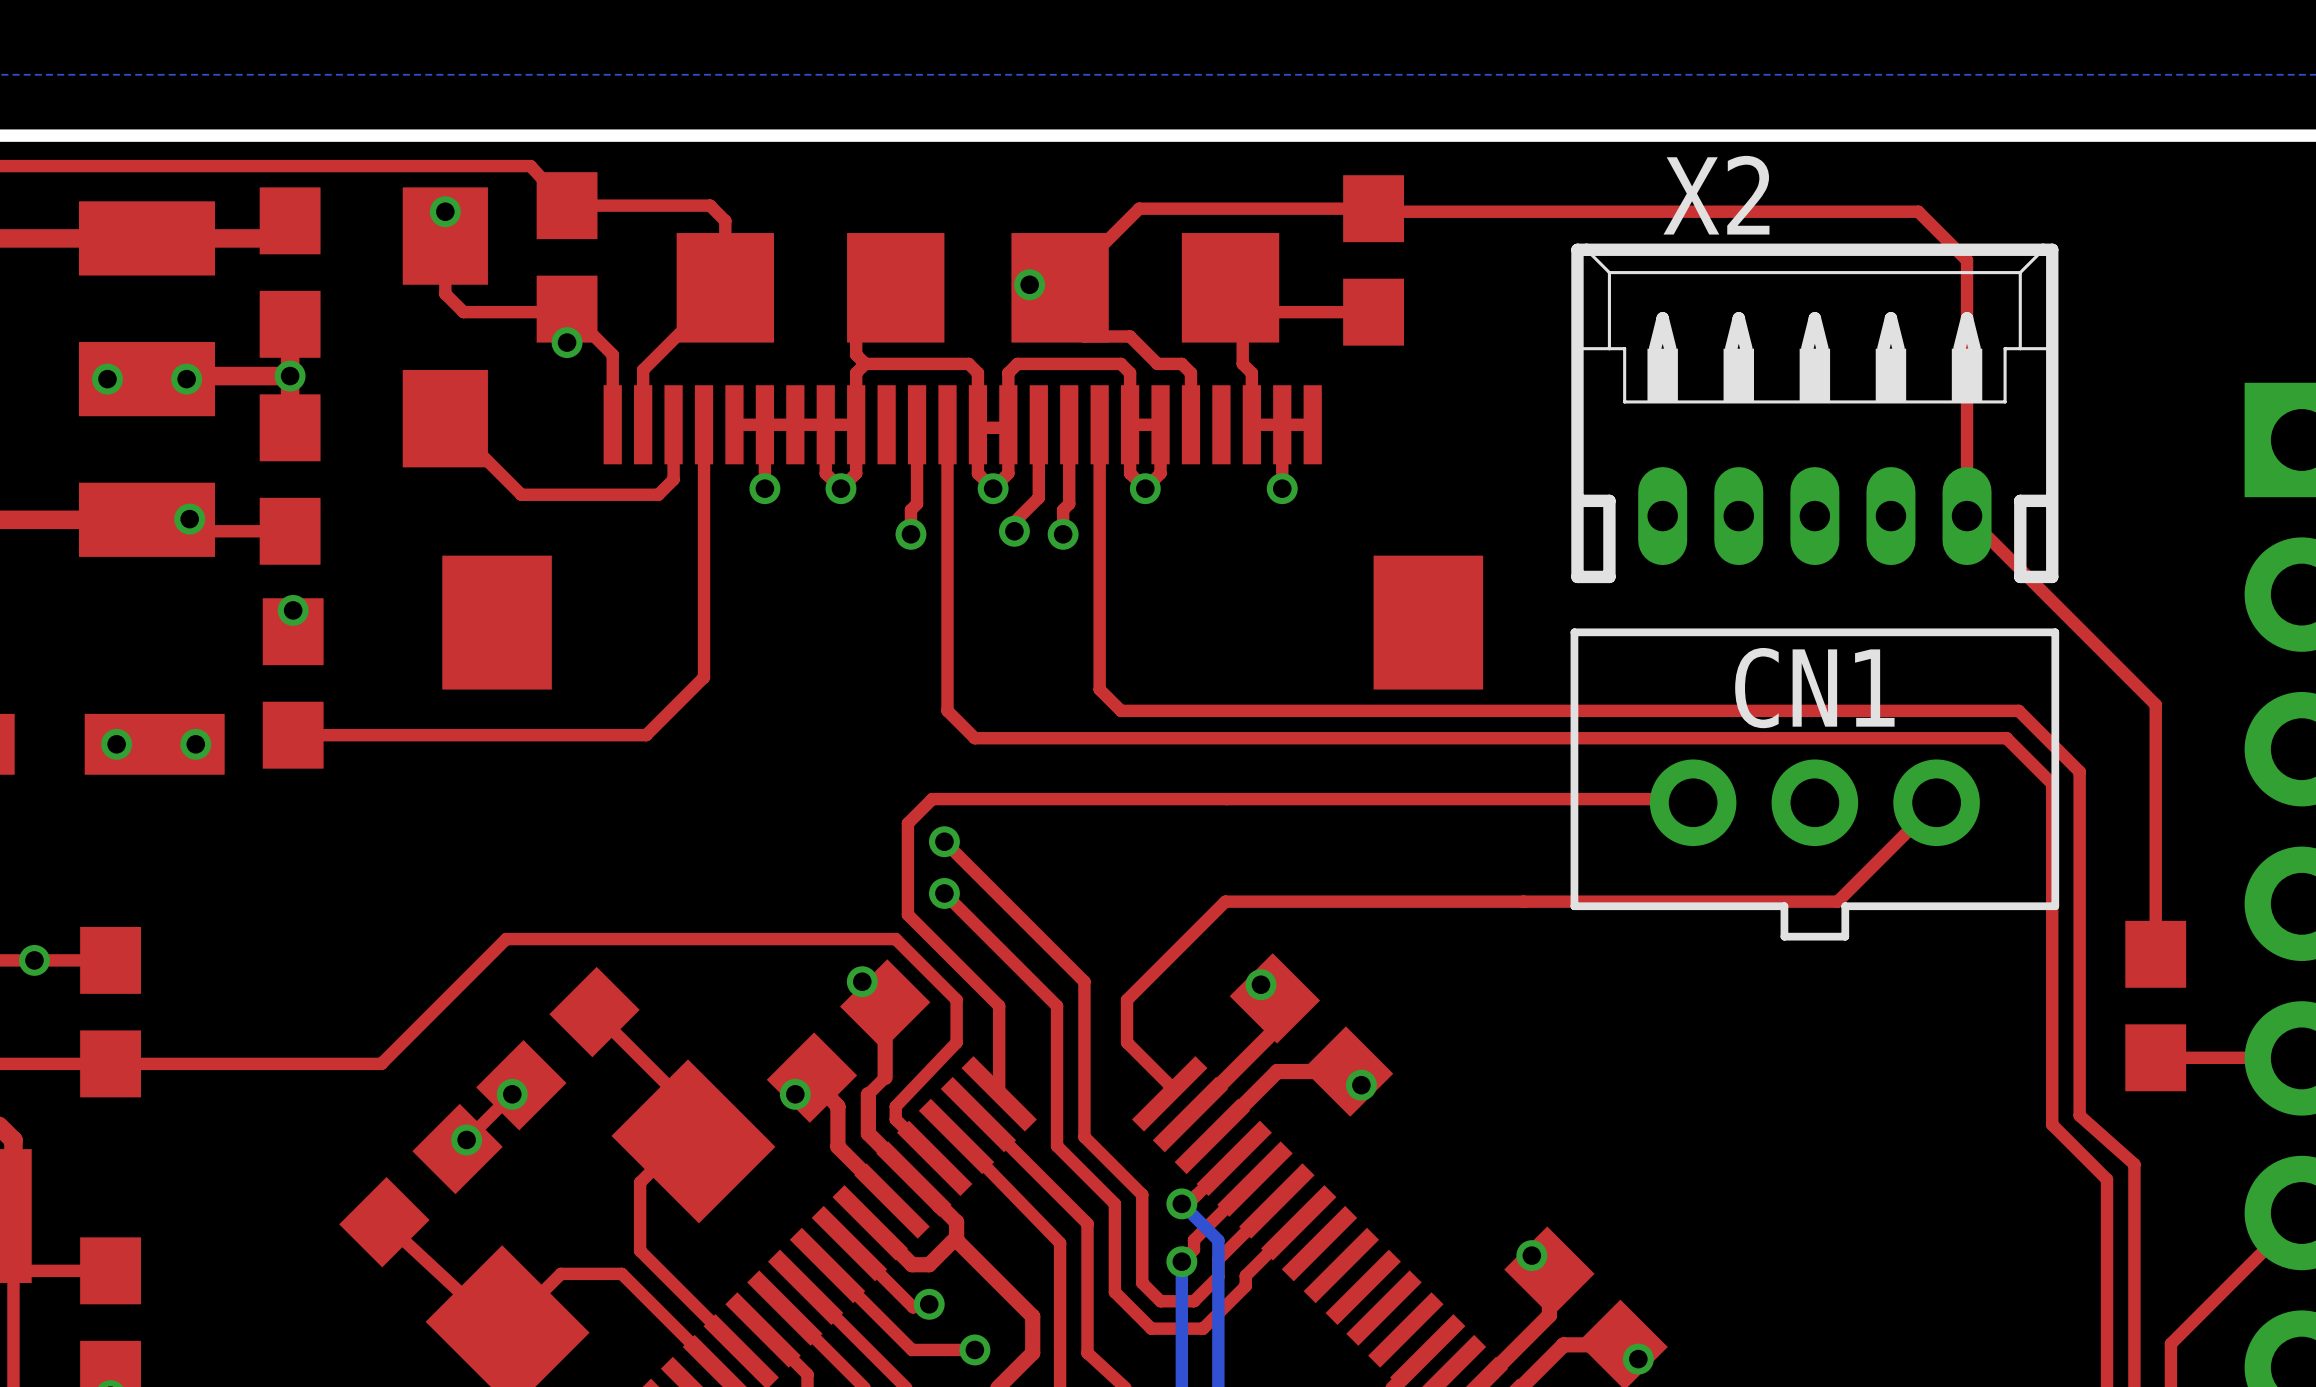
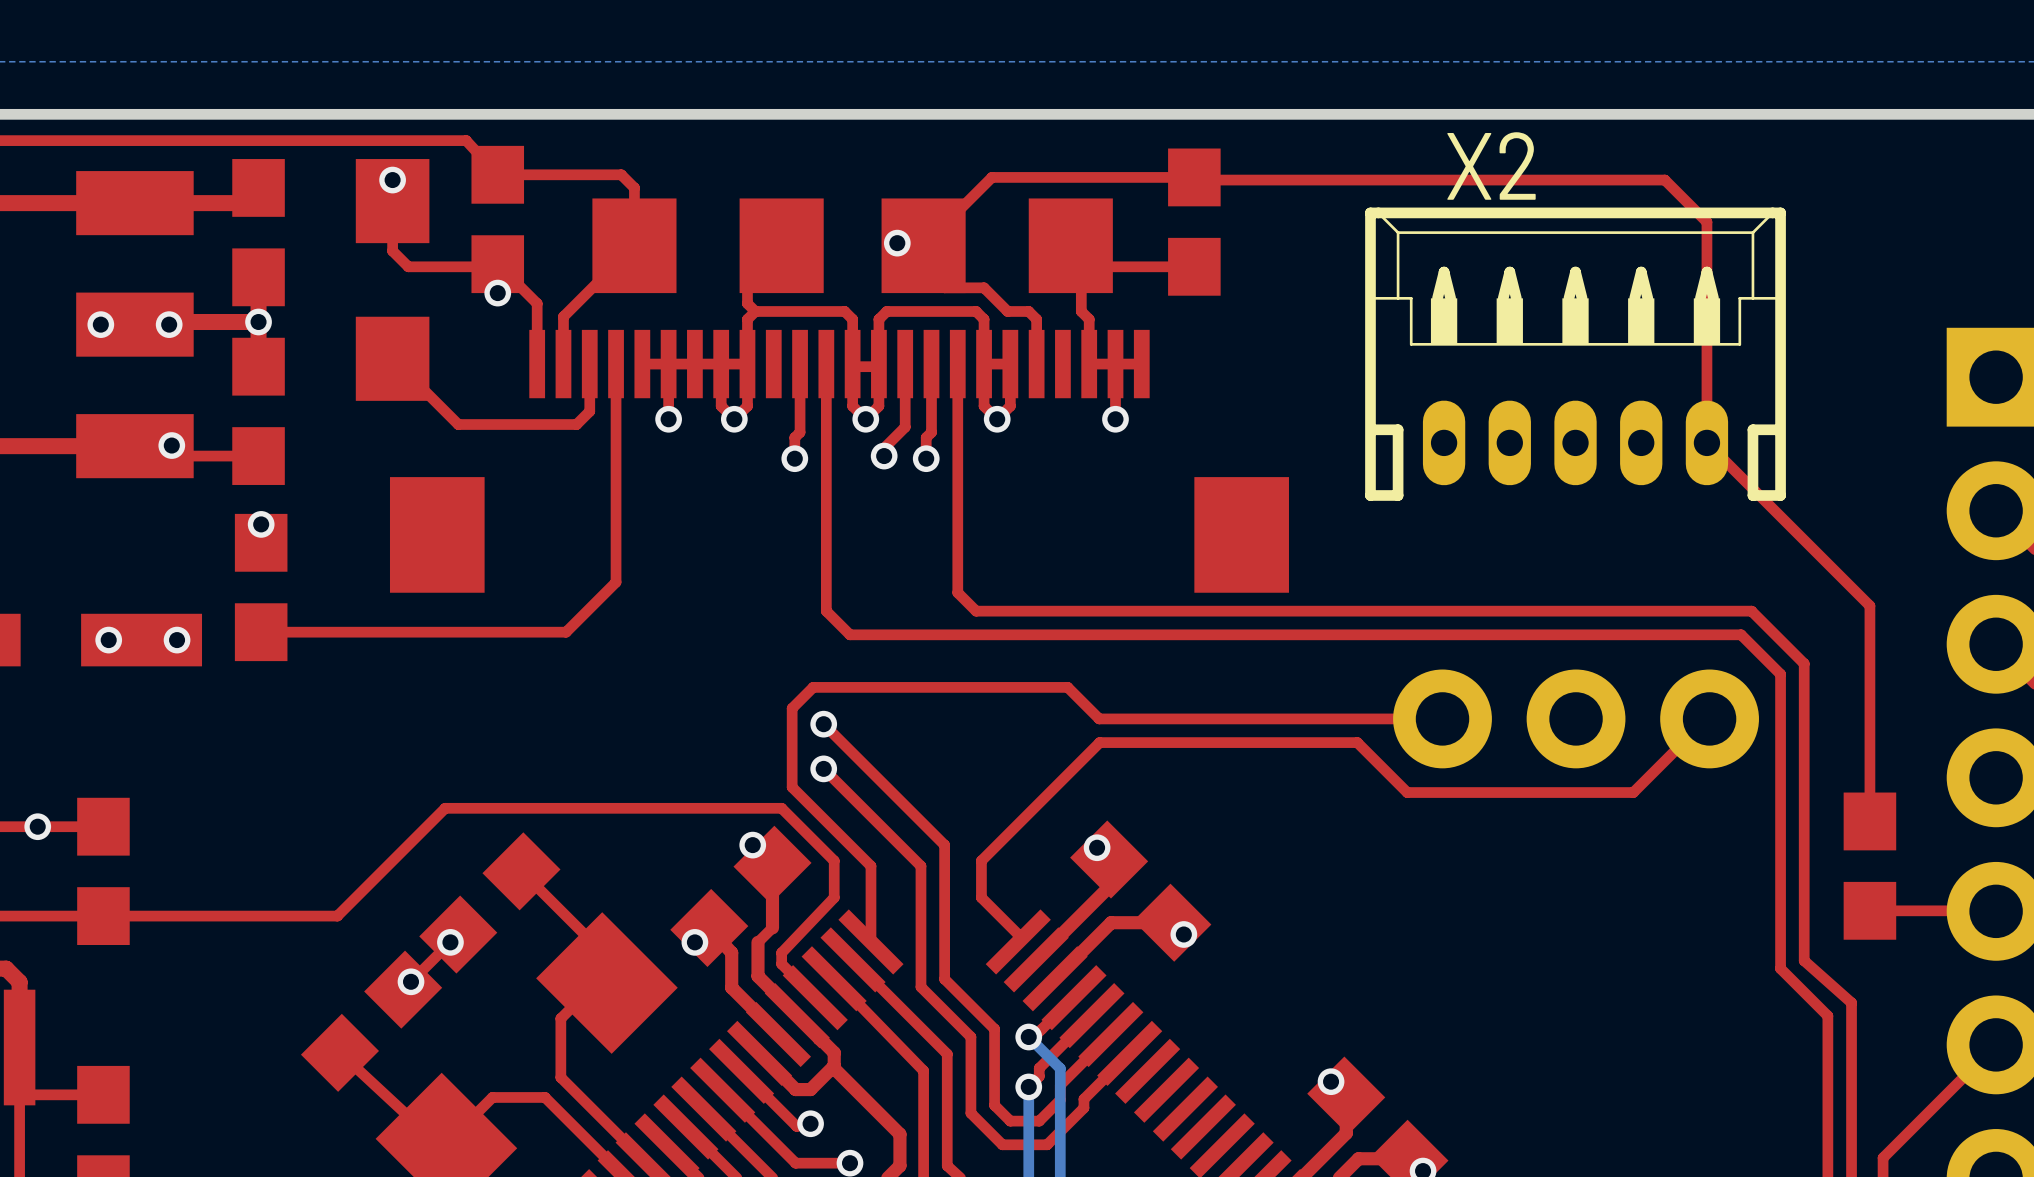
CN1: (1814, 784) -> none
top track: (1226, 799) (1689, 799) (1693, 802) -> (1067, 687) (1099, 718) (1442, 718)
top track: (1936, 802) (1837, 901) (1225, 901) -> (1709, 718) (1706, 718) (1633, 792) (1407, 792) (1357, 742) (1099, 742) (1066, 775)
part: none -> (1576, 718)

